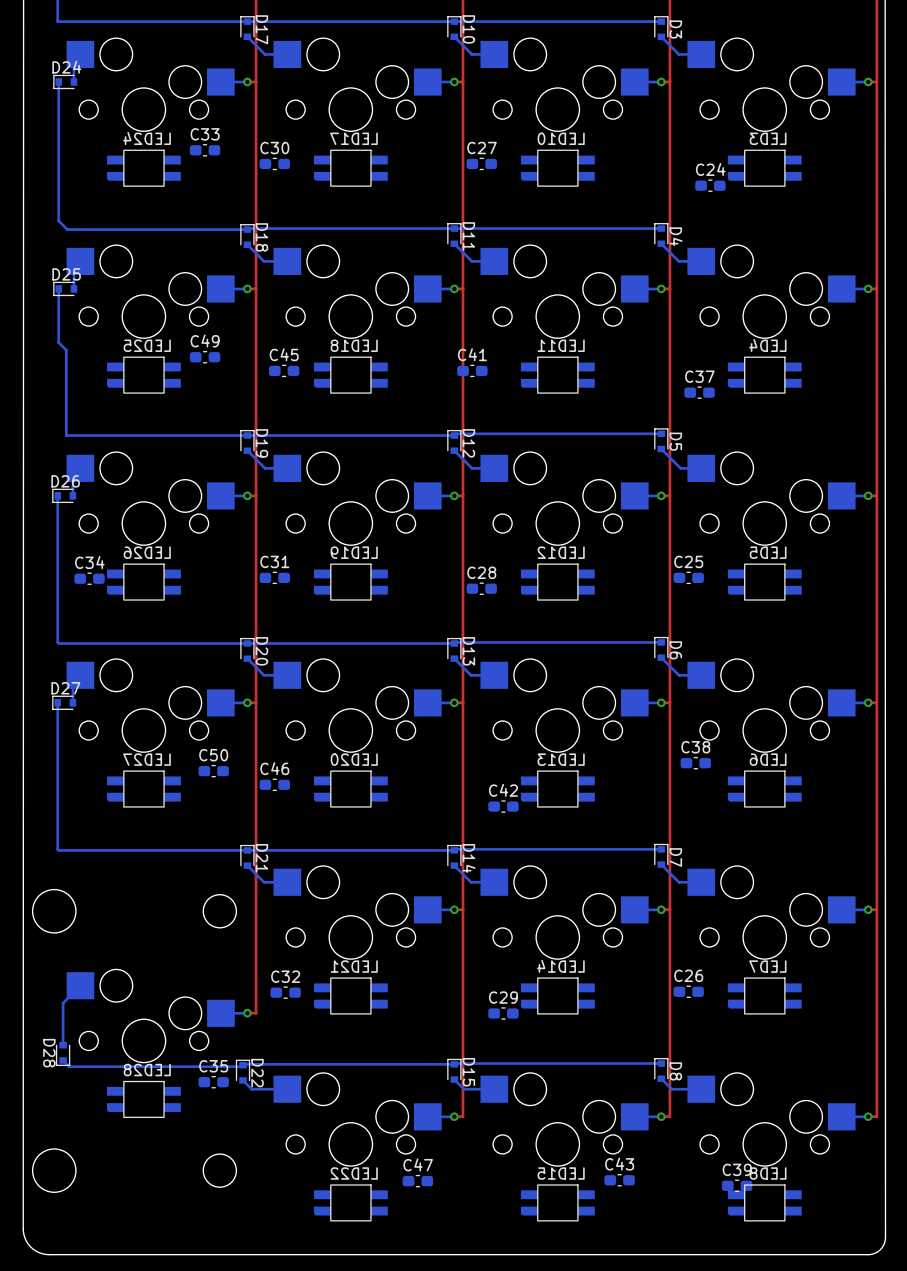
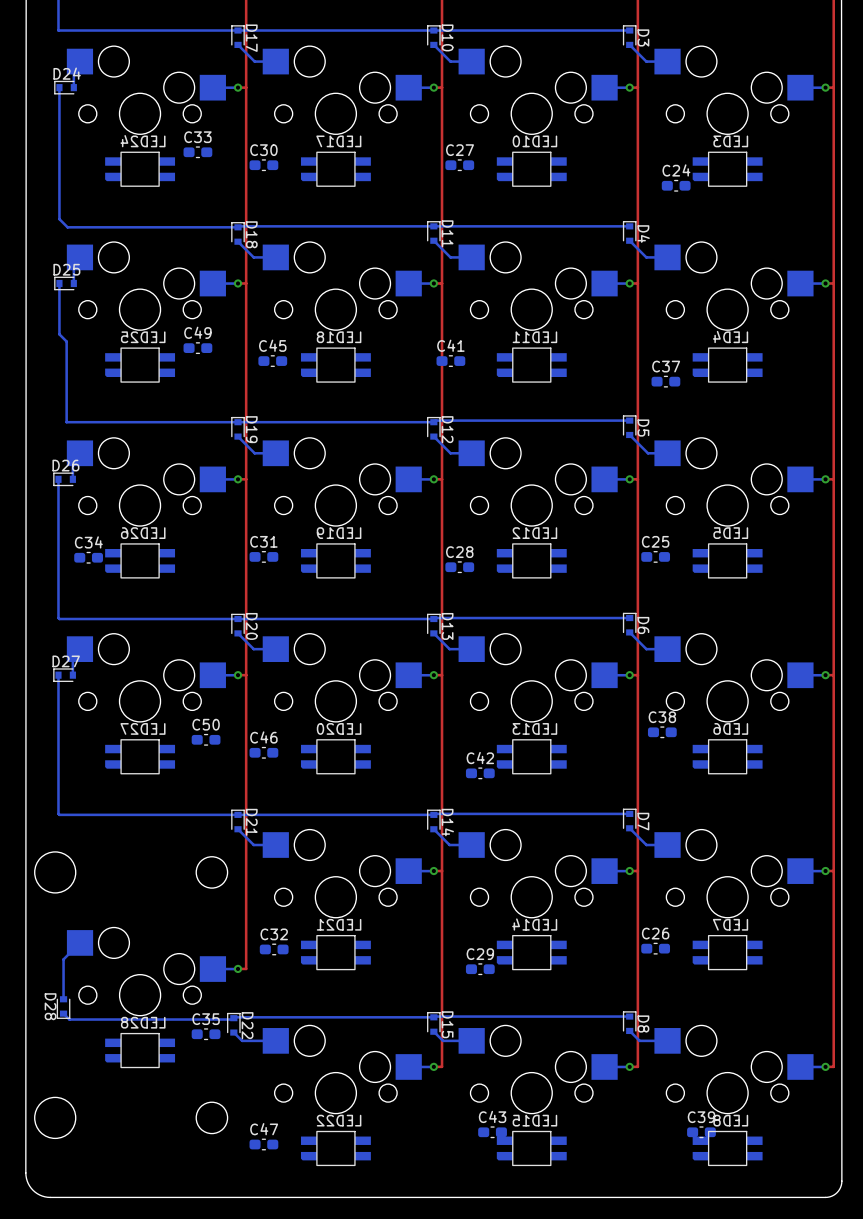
C43 position: (619, 1180) -> (492, 1132)
C47 position: (417, 1181) -> (263, 1144)

